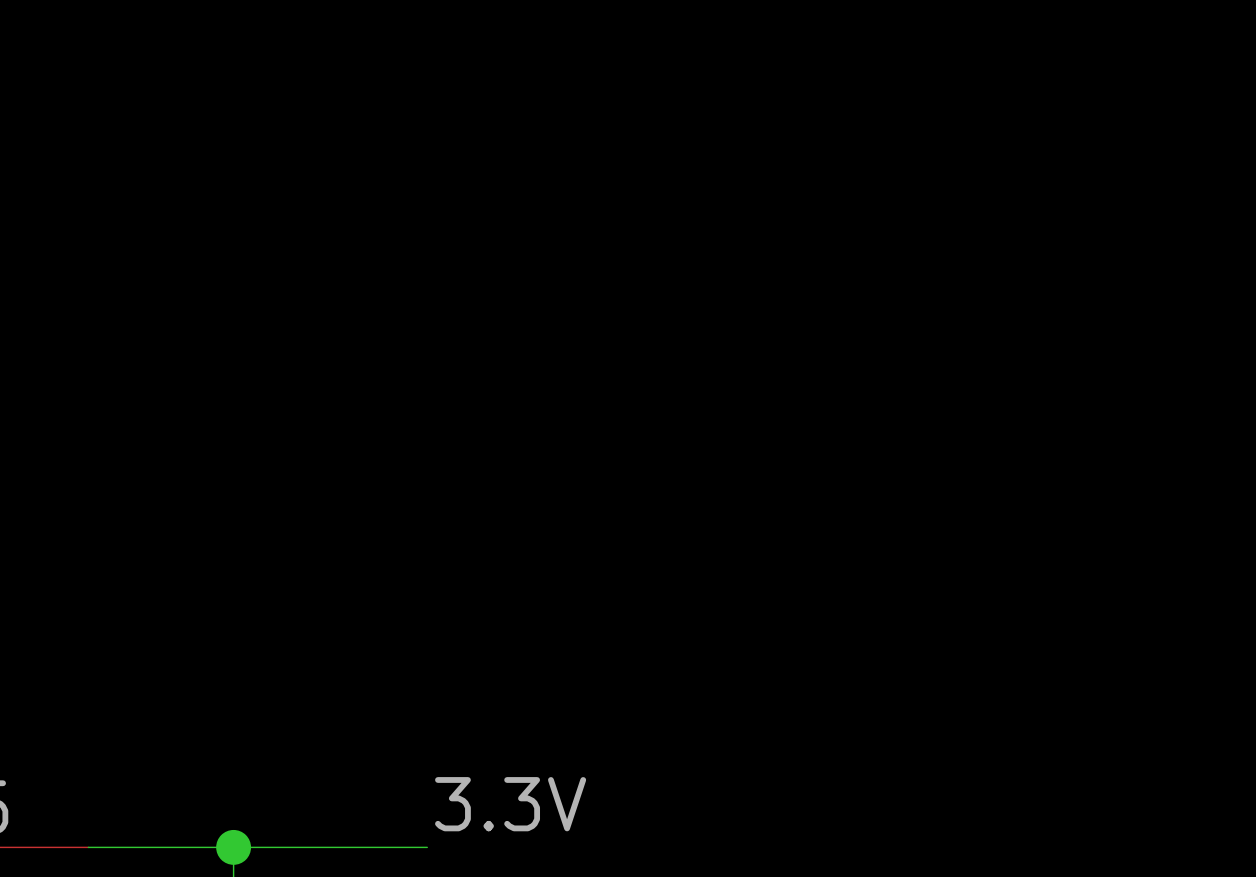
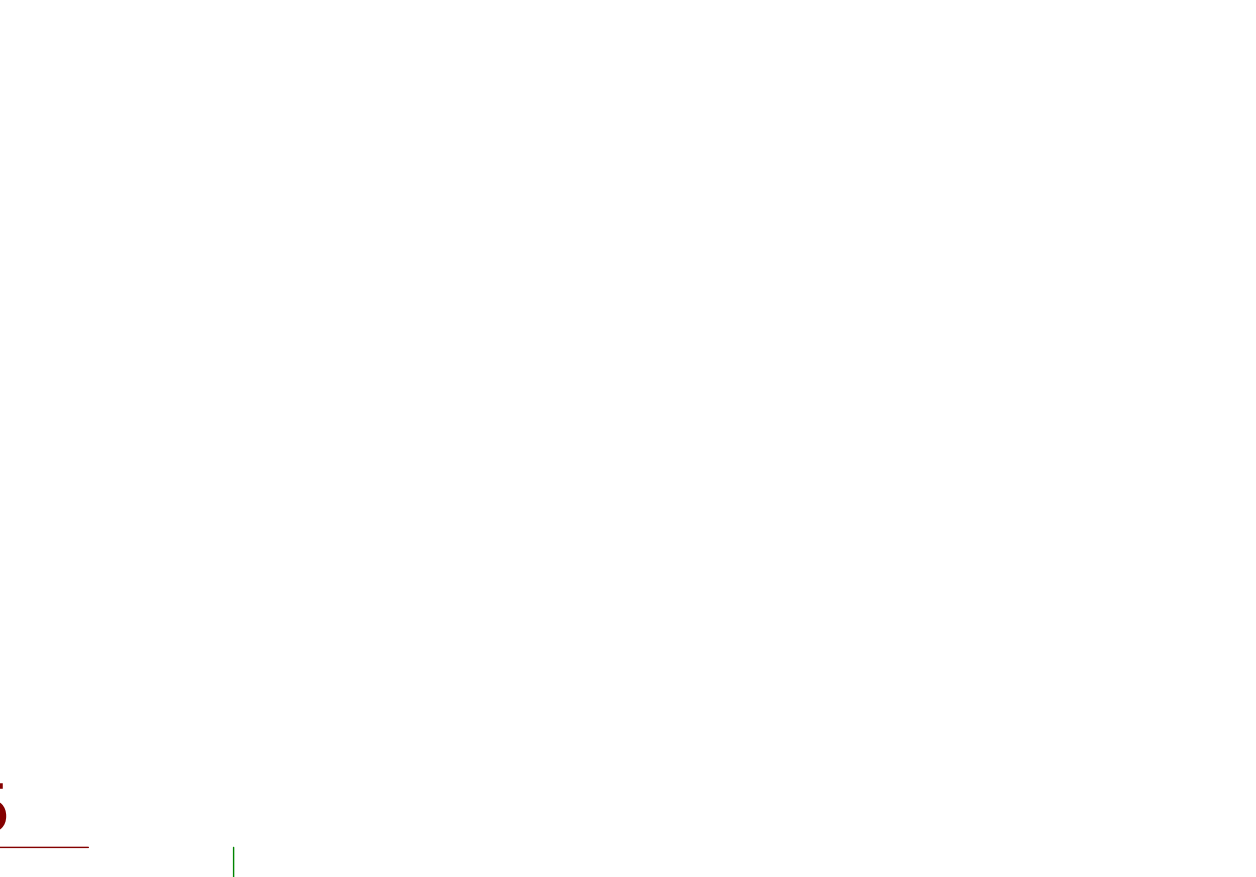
label: 3.3V (510, 804) -> none
wire: (88, 847) (427, 847) -> none
junction: (233, 847) -> none

